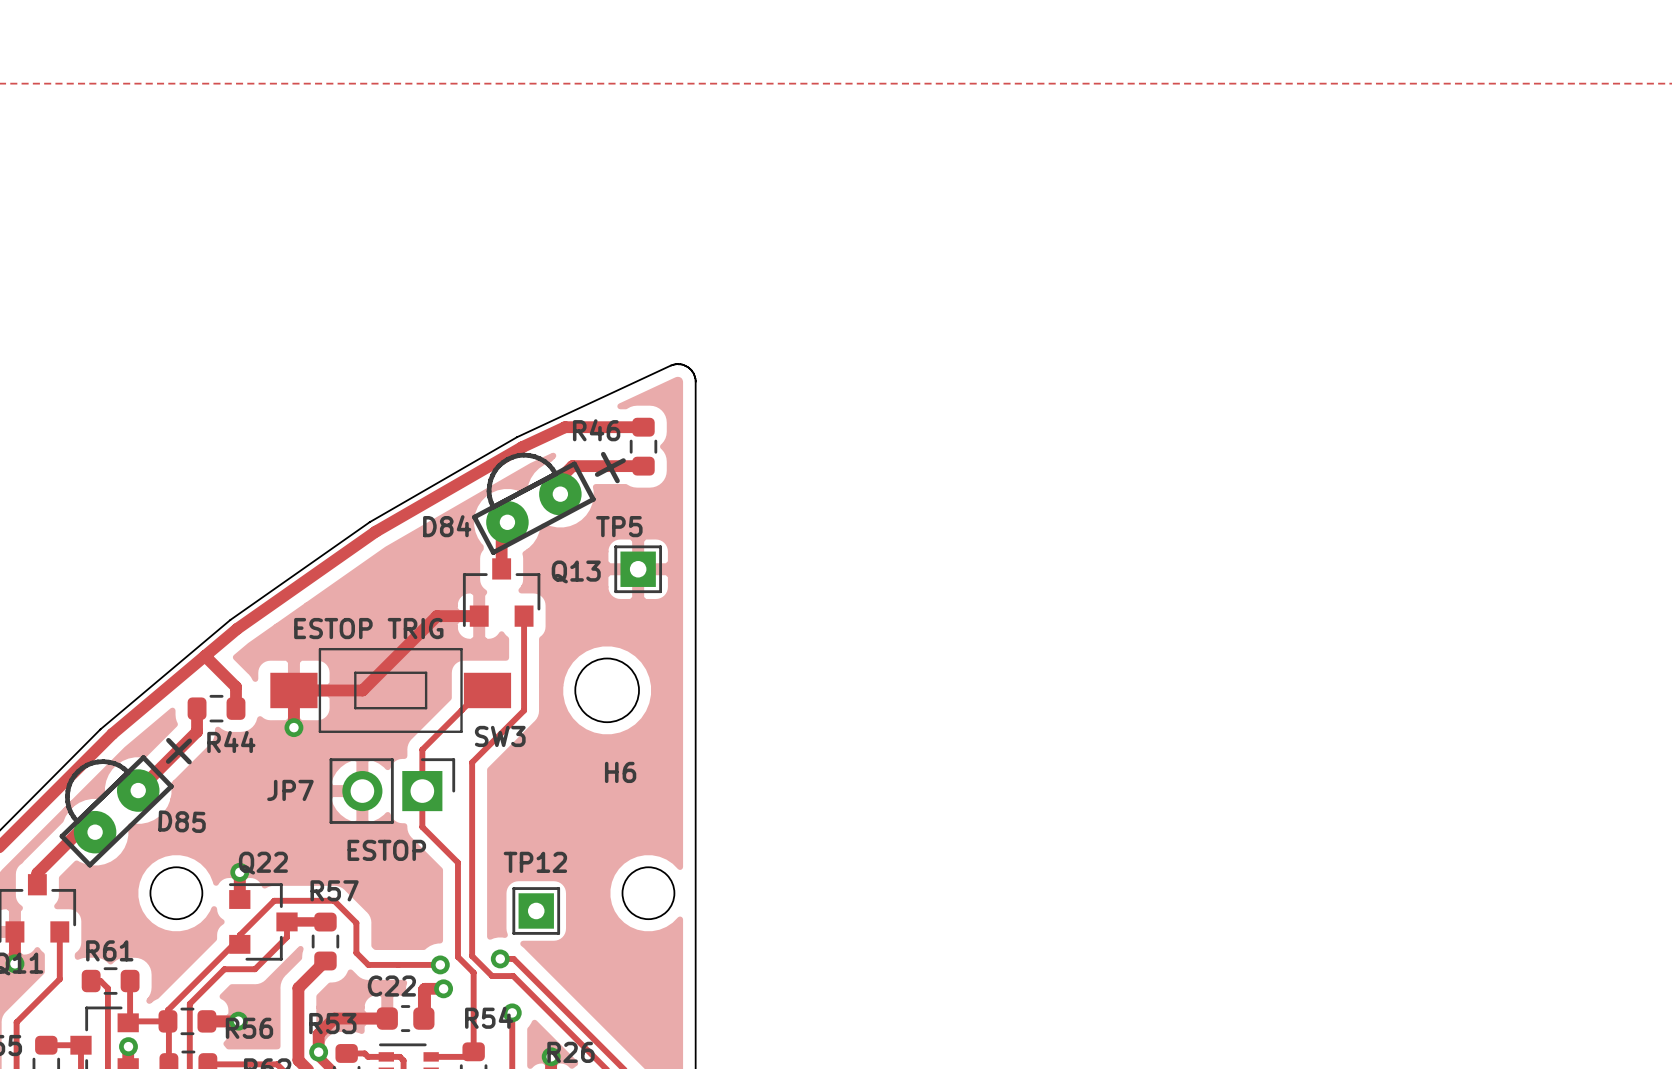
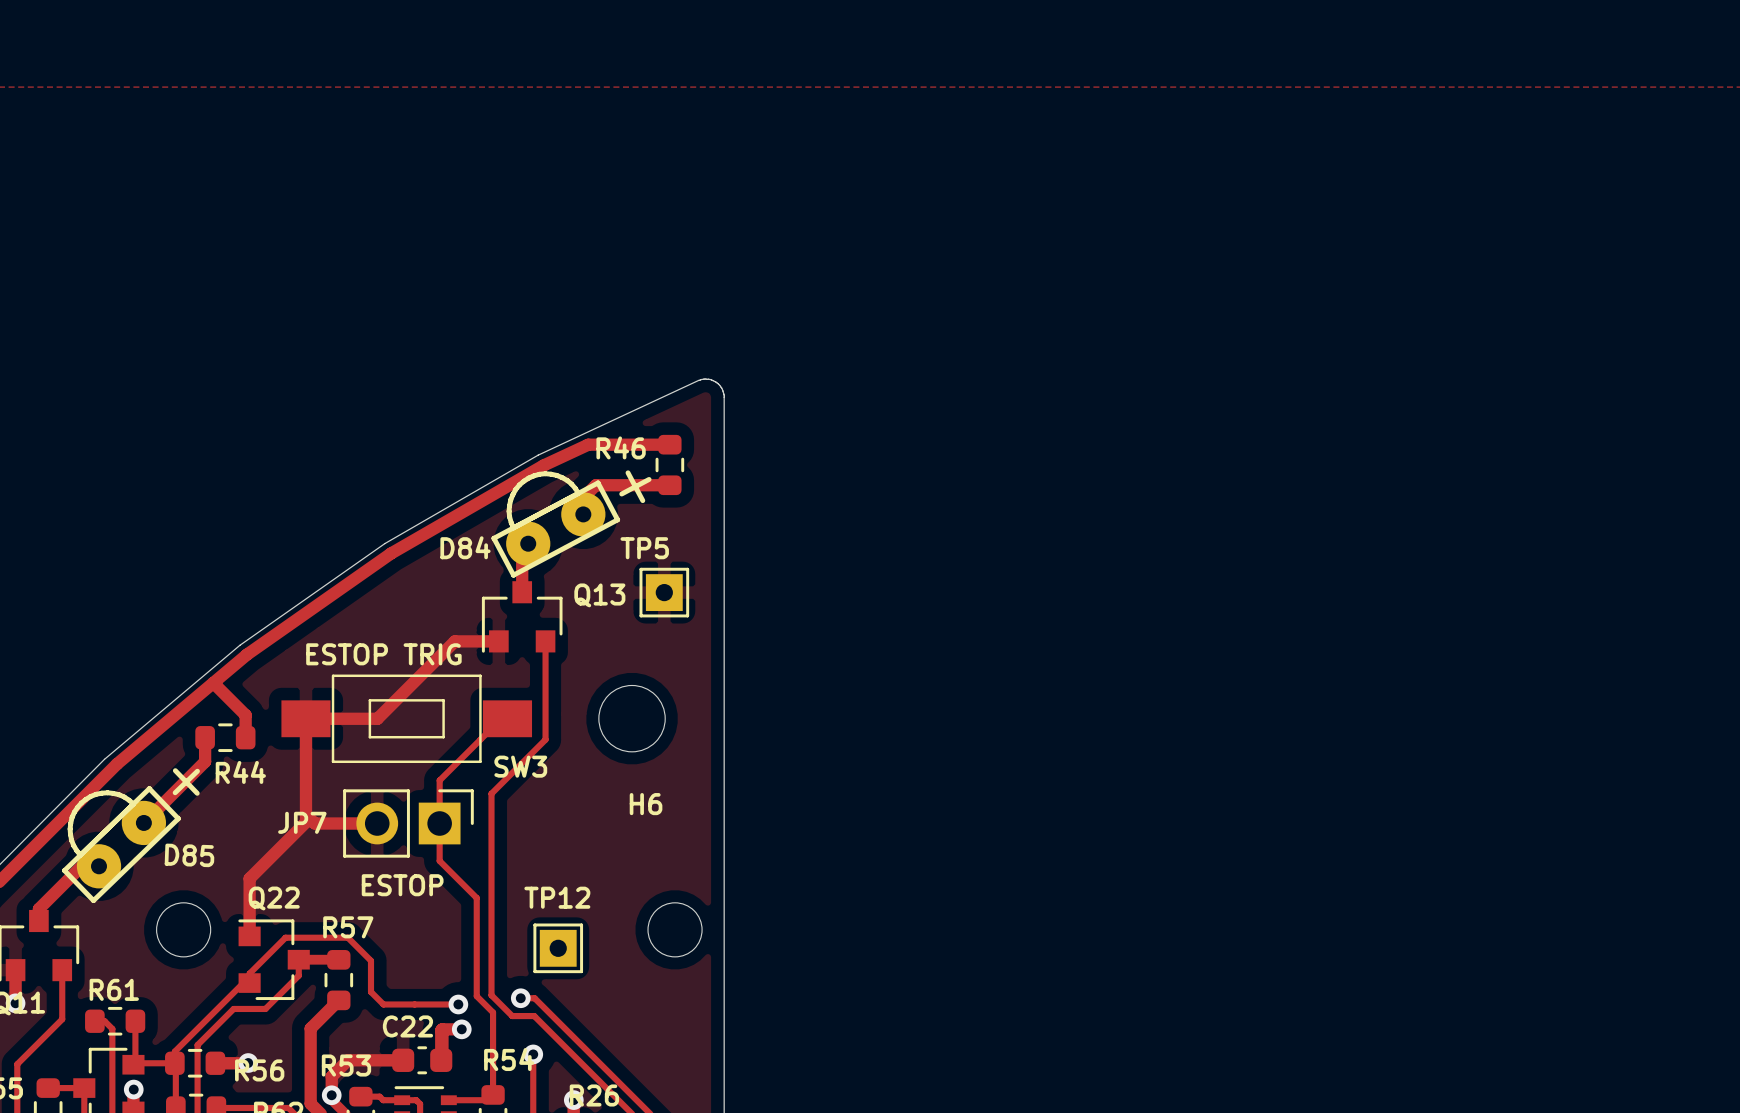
track: none -> (305, 757) (305, 822) (249, 878) (249, 908)
via: (293, 727) -> none
track: none -> (305, 814) (314, 823) (377, 823)
via: (239, 872) -> none

